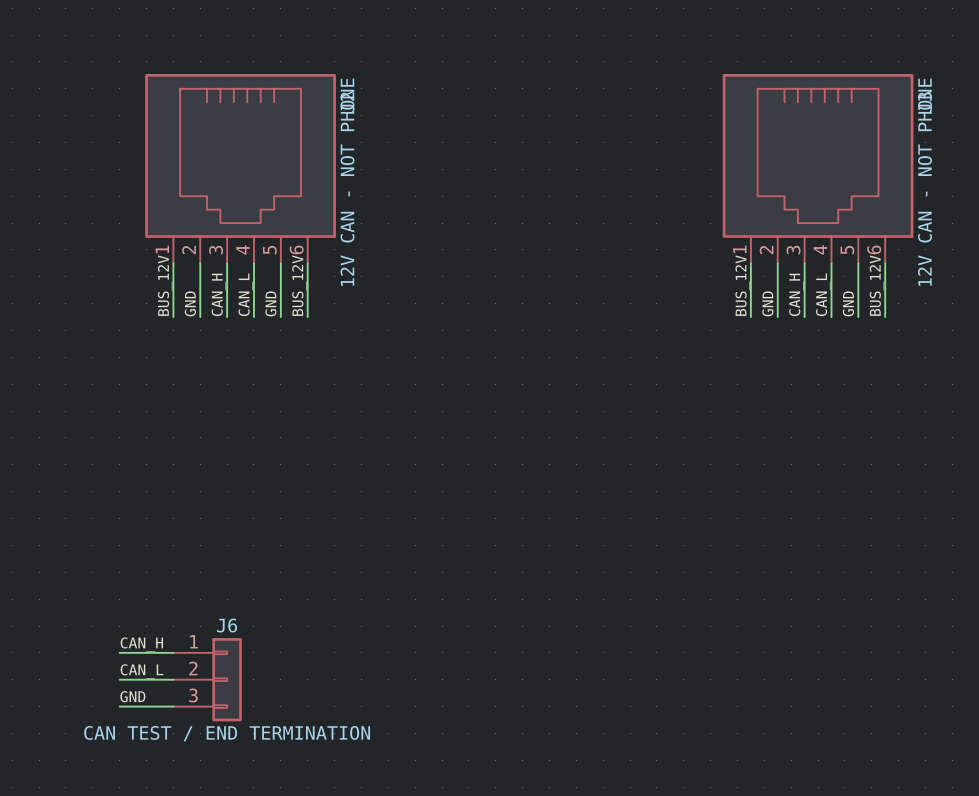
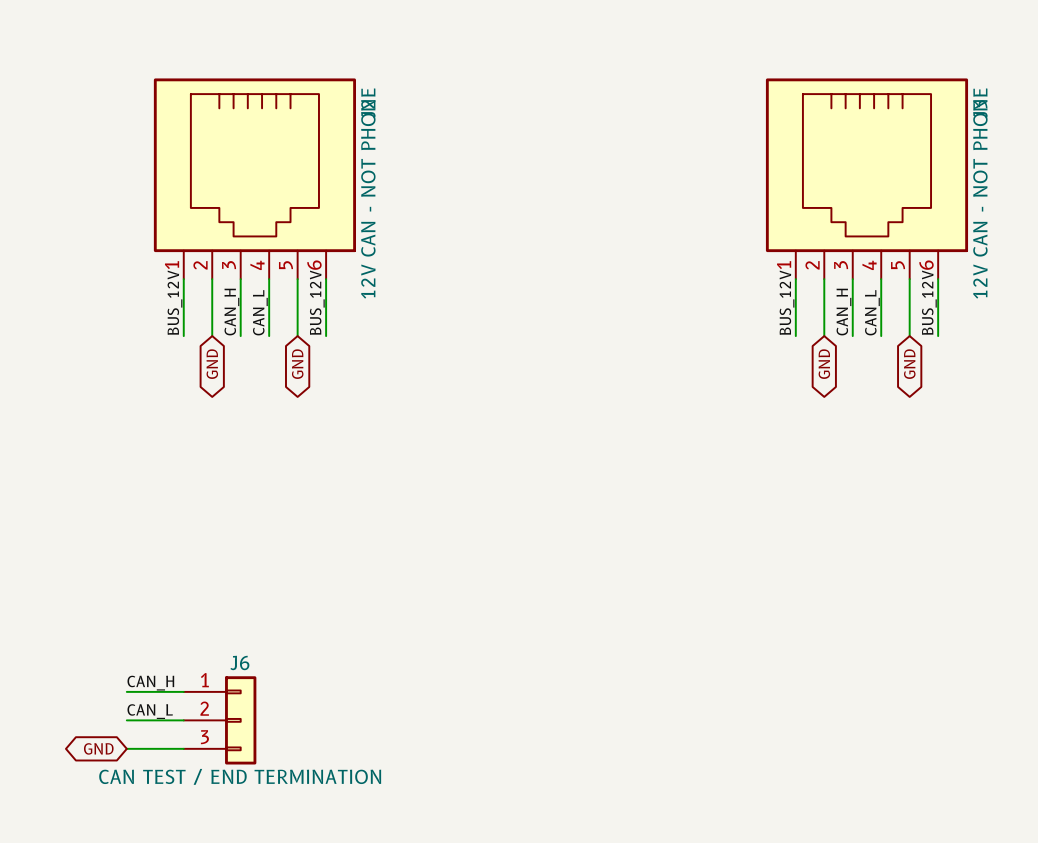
label: GND (190, 303) -> none
label: GND (270, 303) -> none
label: GND (767, 303) -> none
label: GND (848, 303) -> none
global label: none -> GND (212, 364)
global label: none -> GND (297, 364)
global label: none -> GND (824, 364)
global label: none -> GND (909, 364)
label: GND (132, 696) -> none
global label: none -> GND (98, 748)

